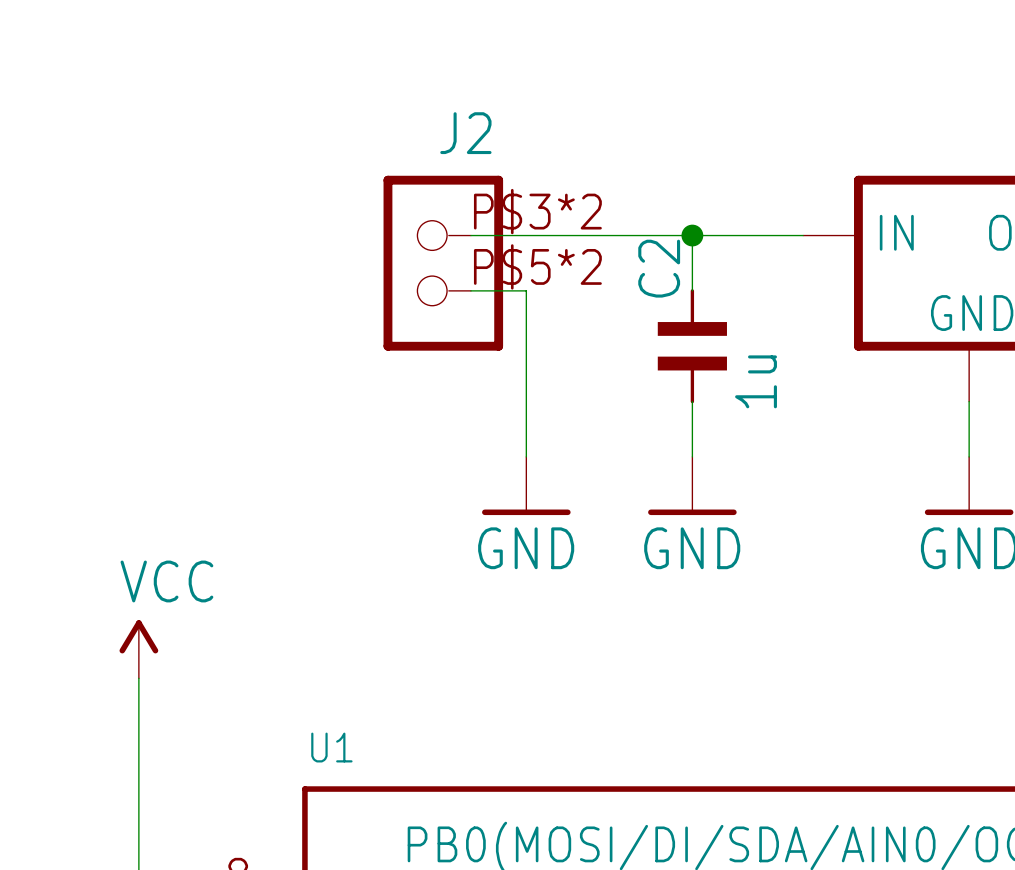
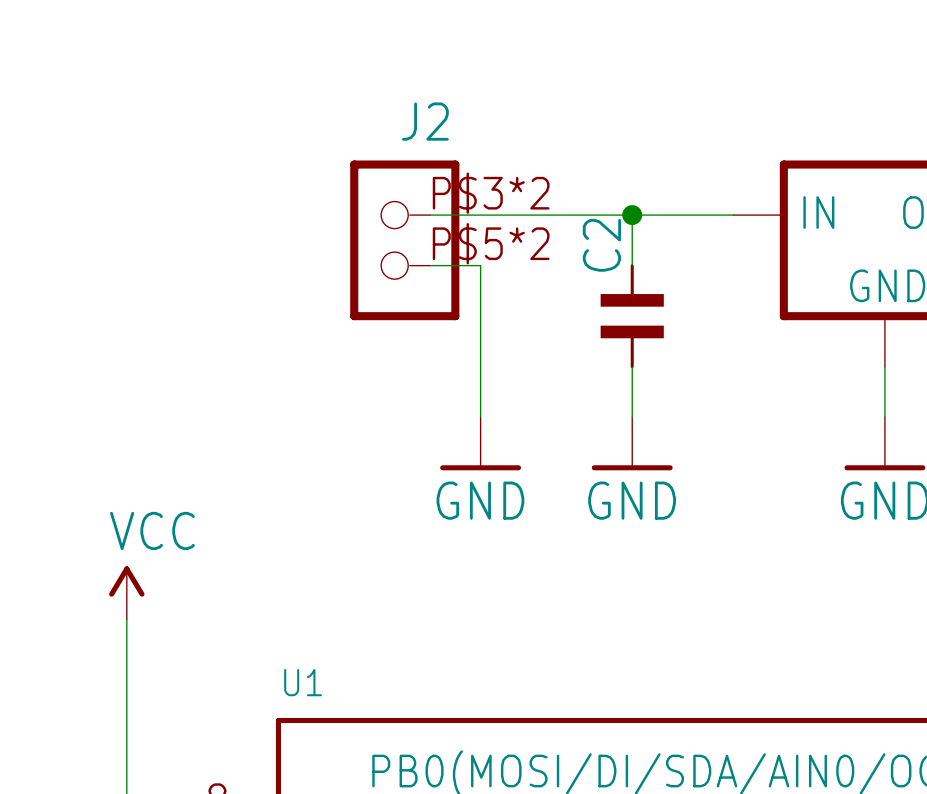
C2 value: 1u (756, 381) -> none

